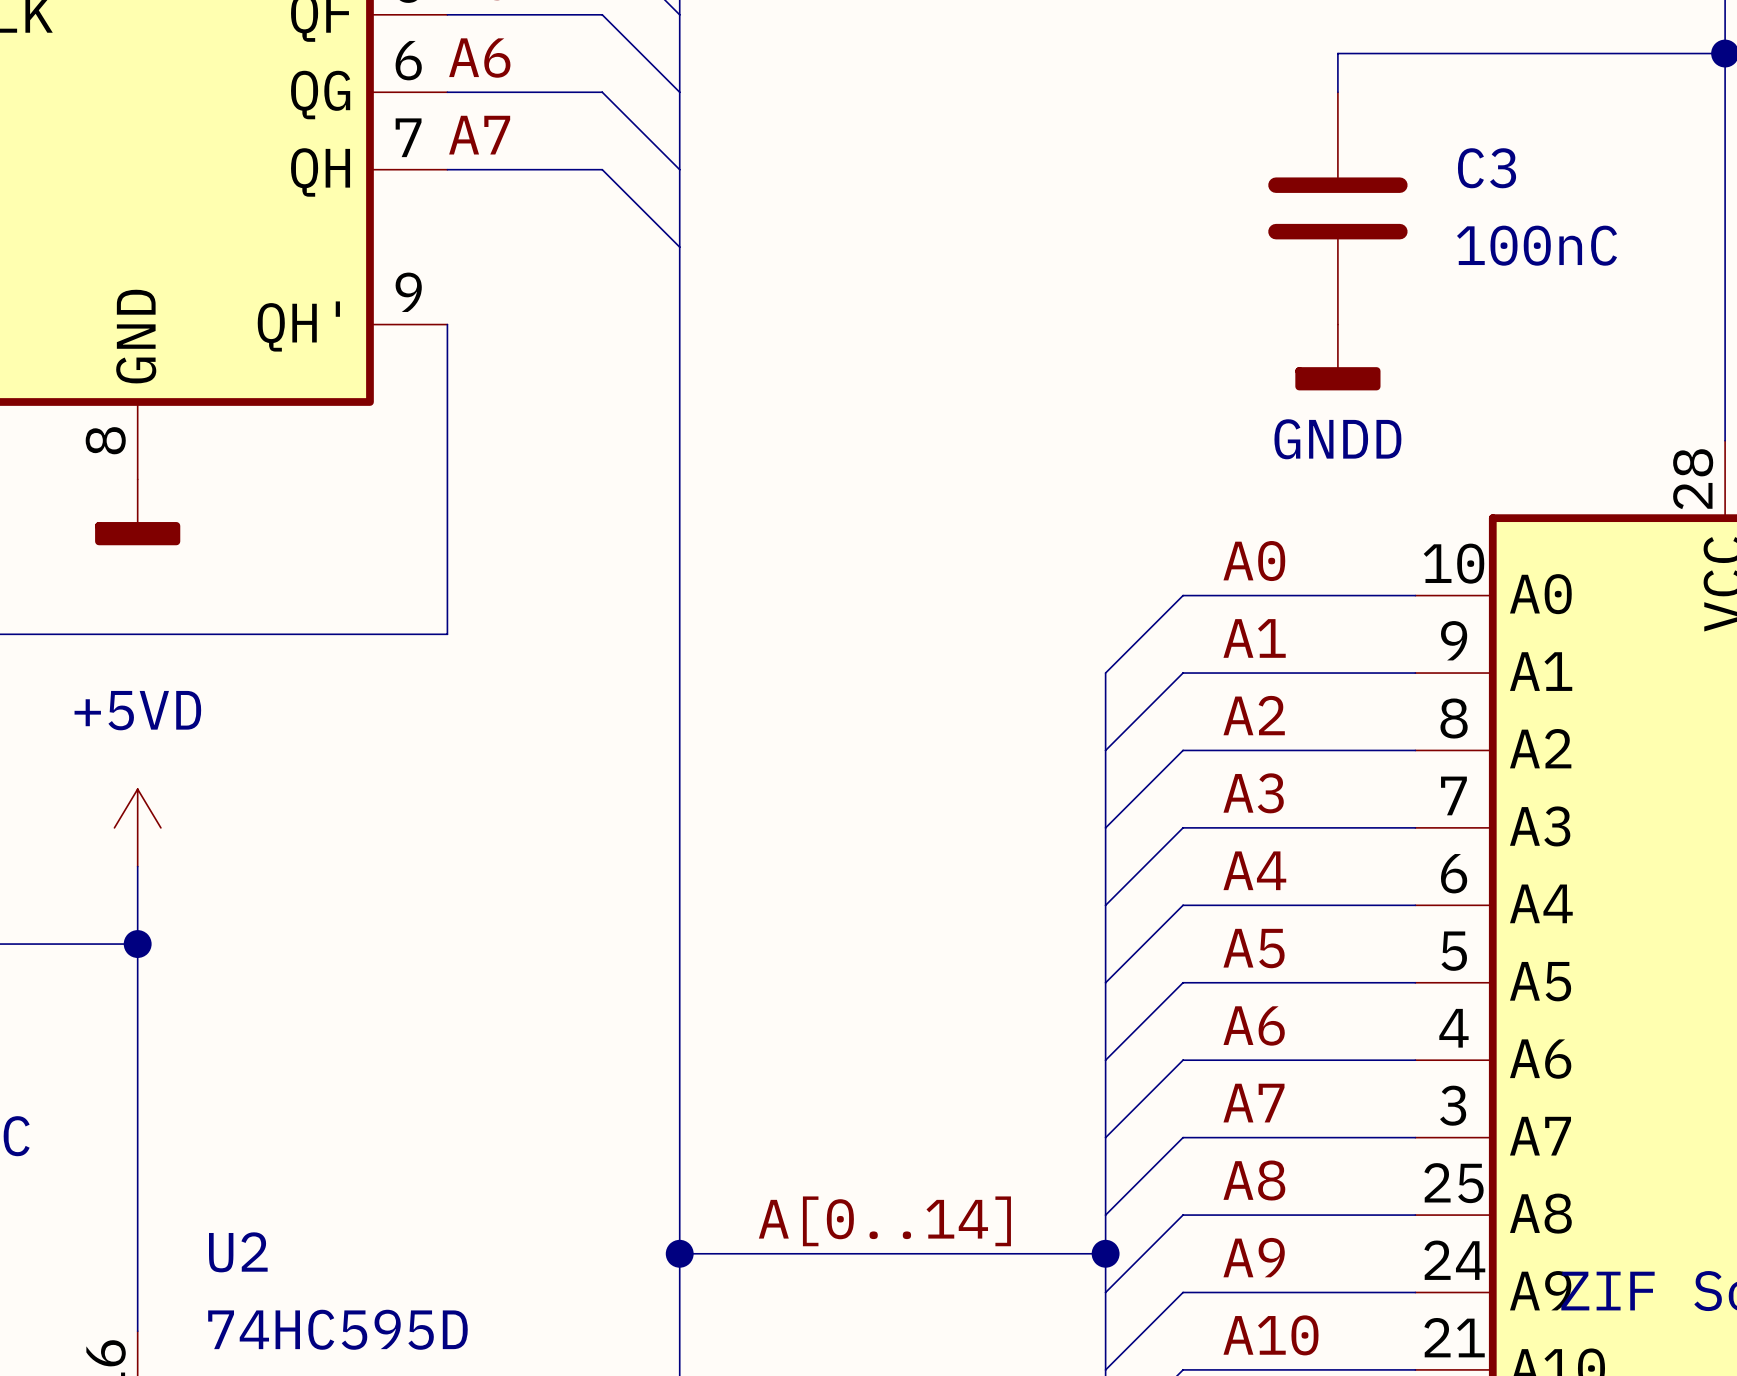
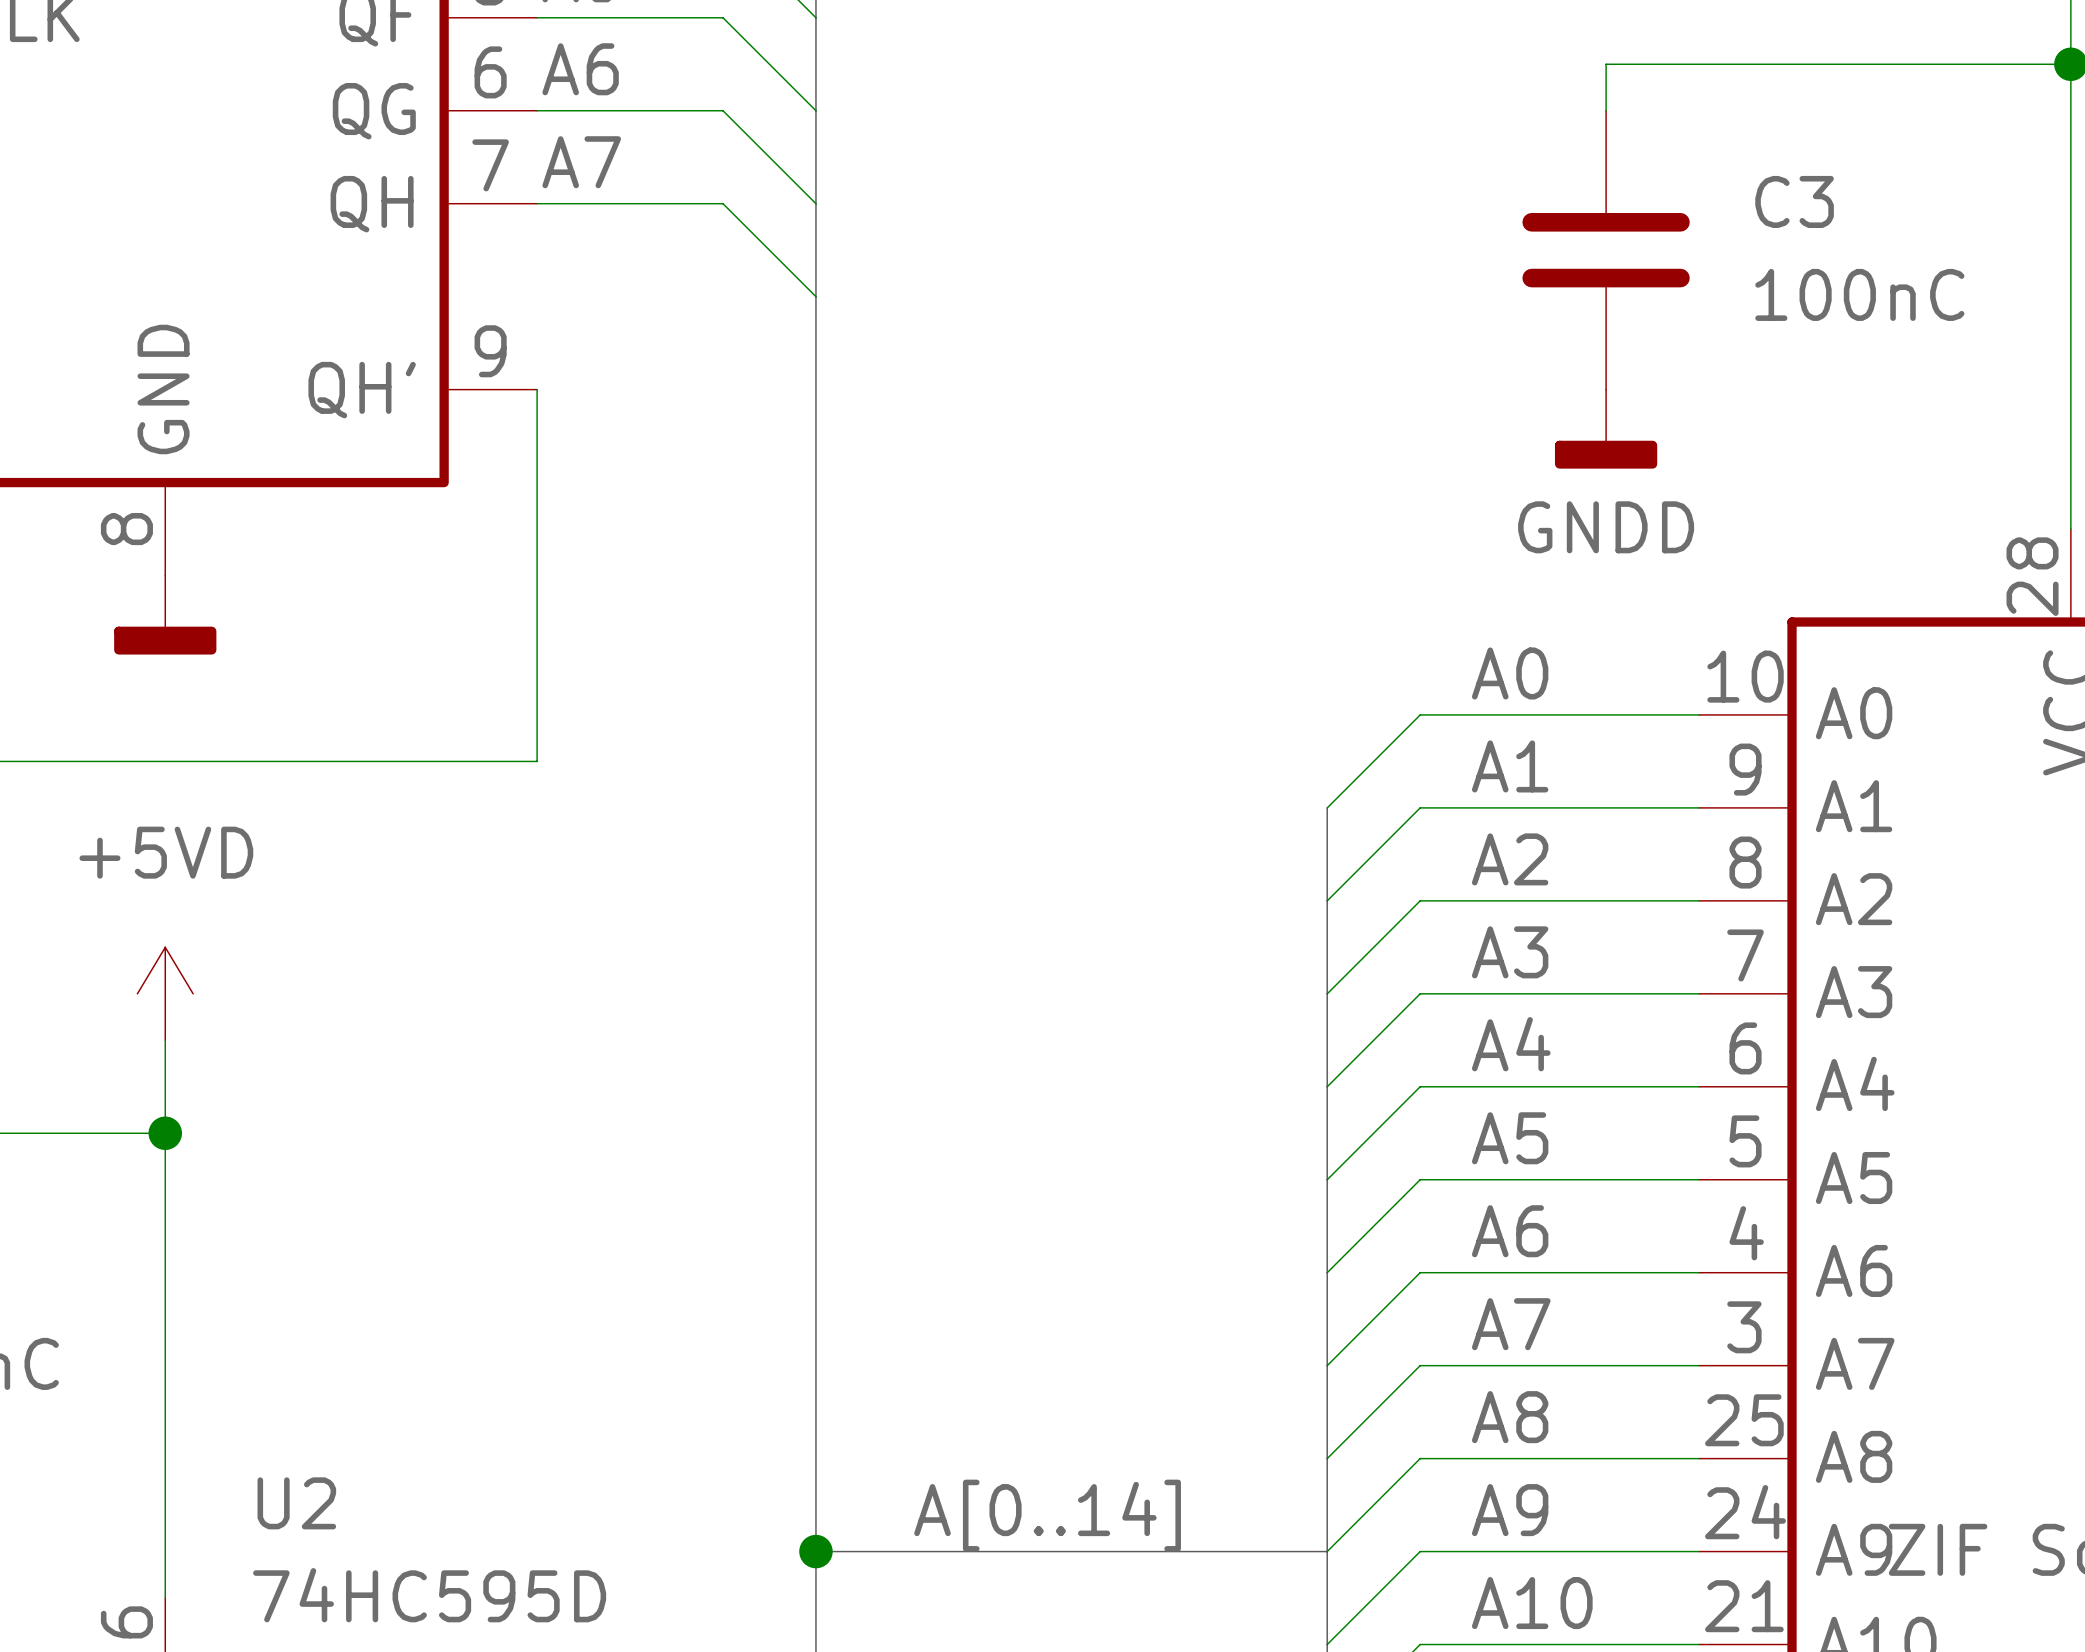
label position: A[0..14] (884, 1221) -> A[0..14] (1047, 1515)
bus: (679, 1253) (1105, 1253) -> (815, 1551) (1327, 1551)
junction position: (679, 1253) -> (815, 1551)
junction: (1105, 1253) -> none

